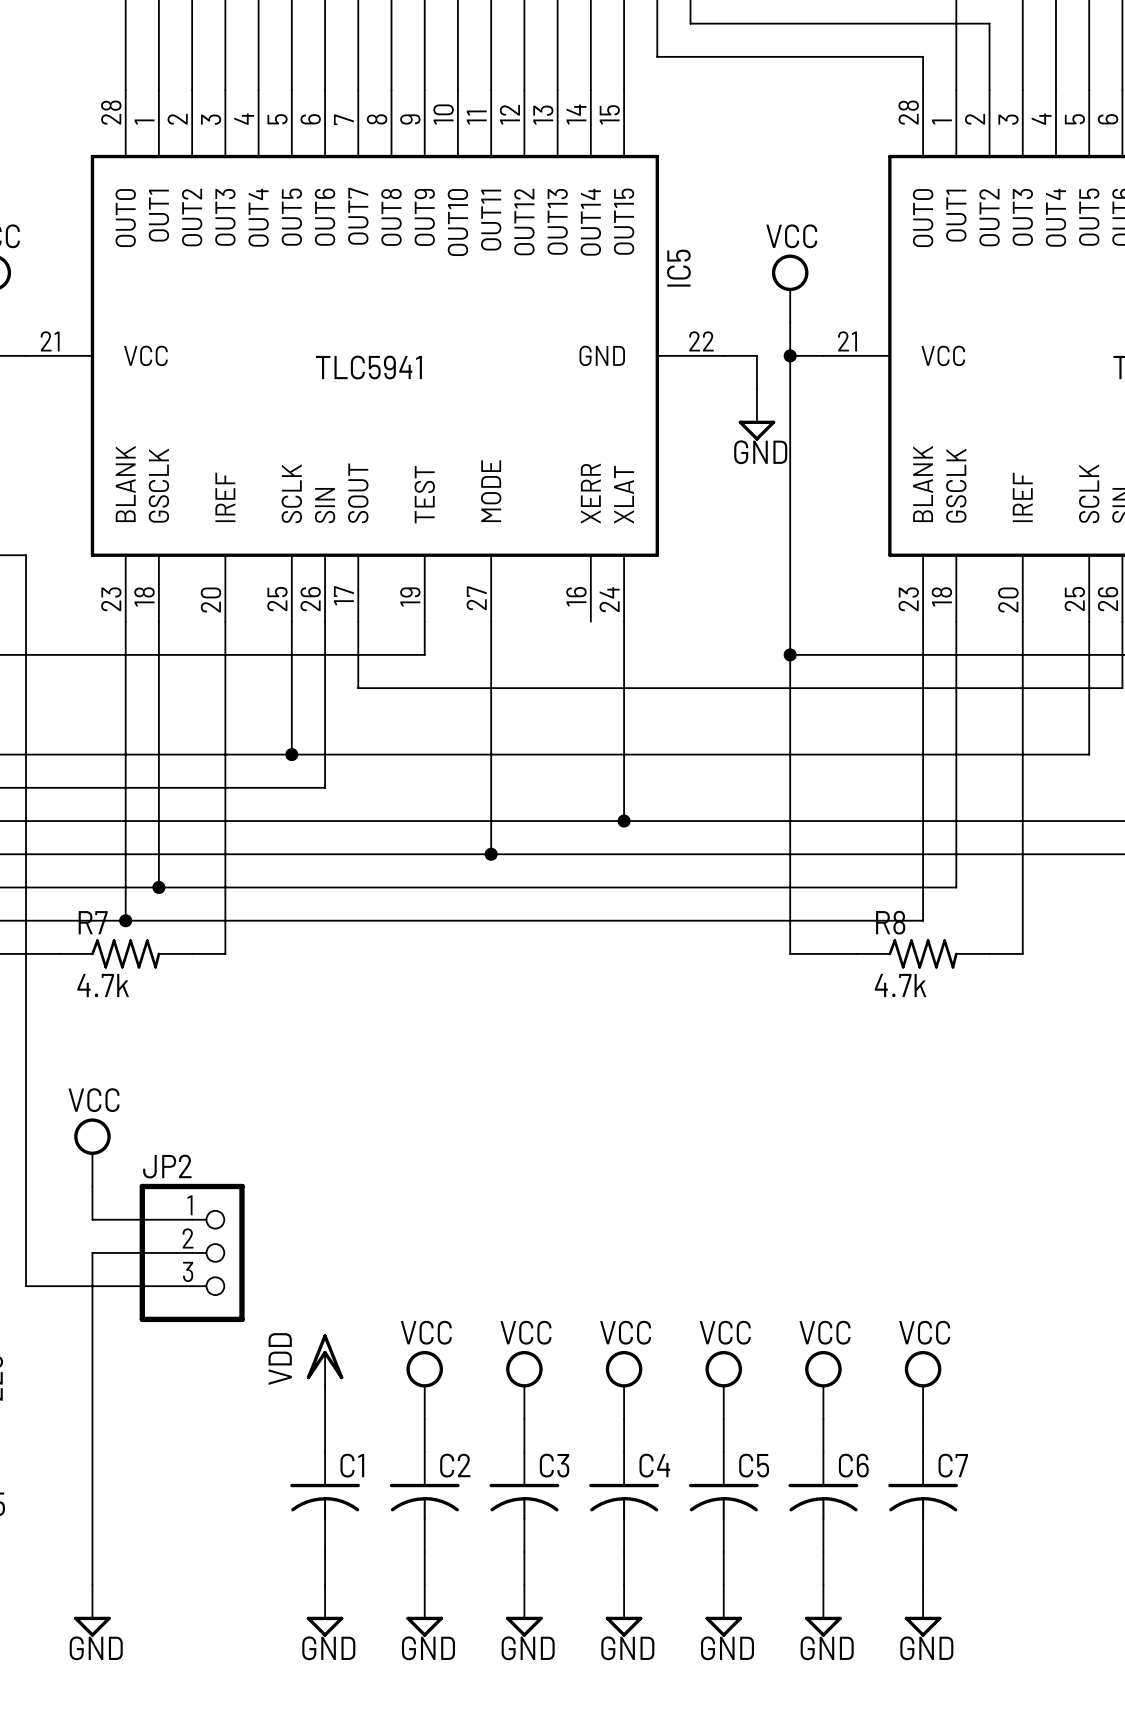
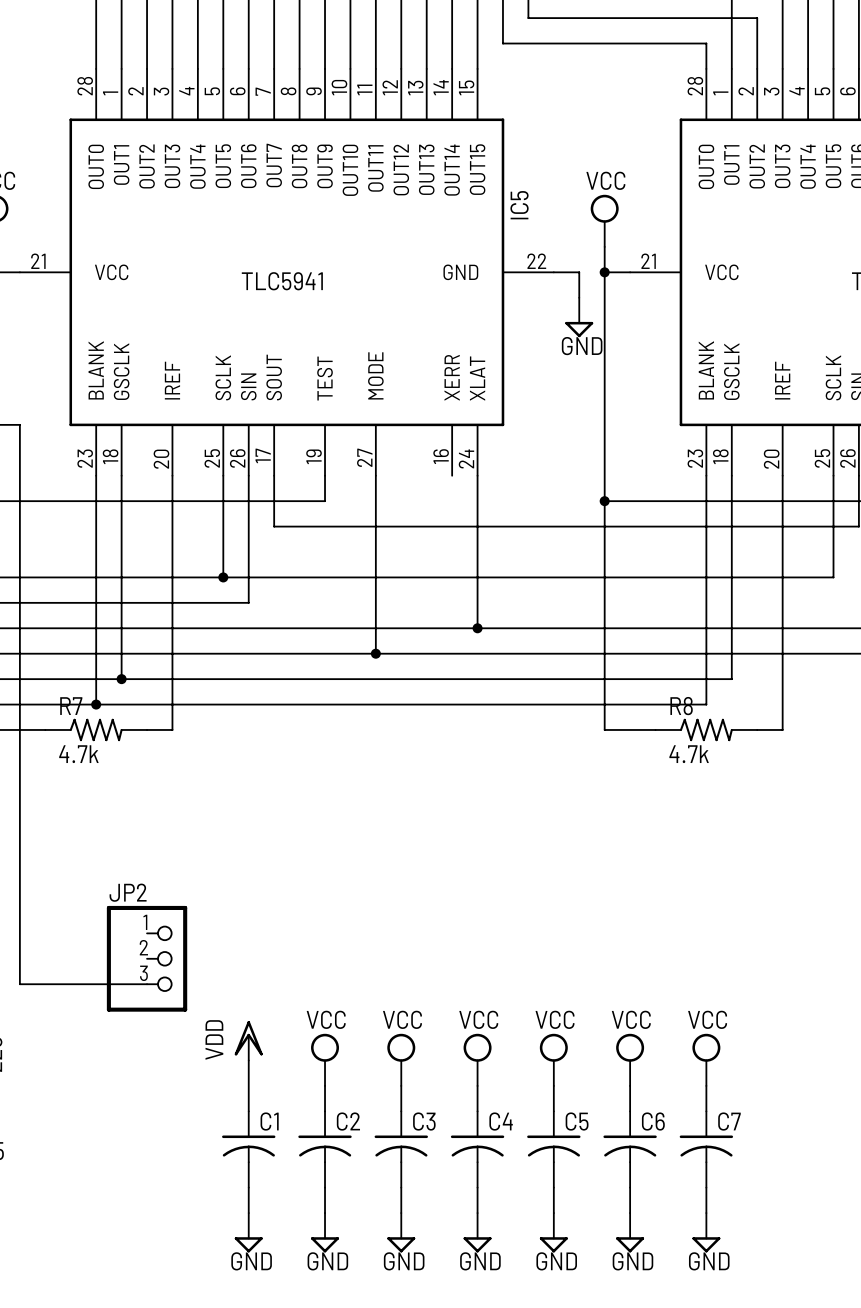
power symbol: VCC (92, 1152) -> none
wire: (92, 1186) (92, 1219) (192, 1219) -> none
wire: (192, 1252) (92, 1252) (92, 1585) -> none
power symbol: GND (92, 1610) -> none

